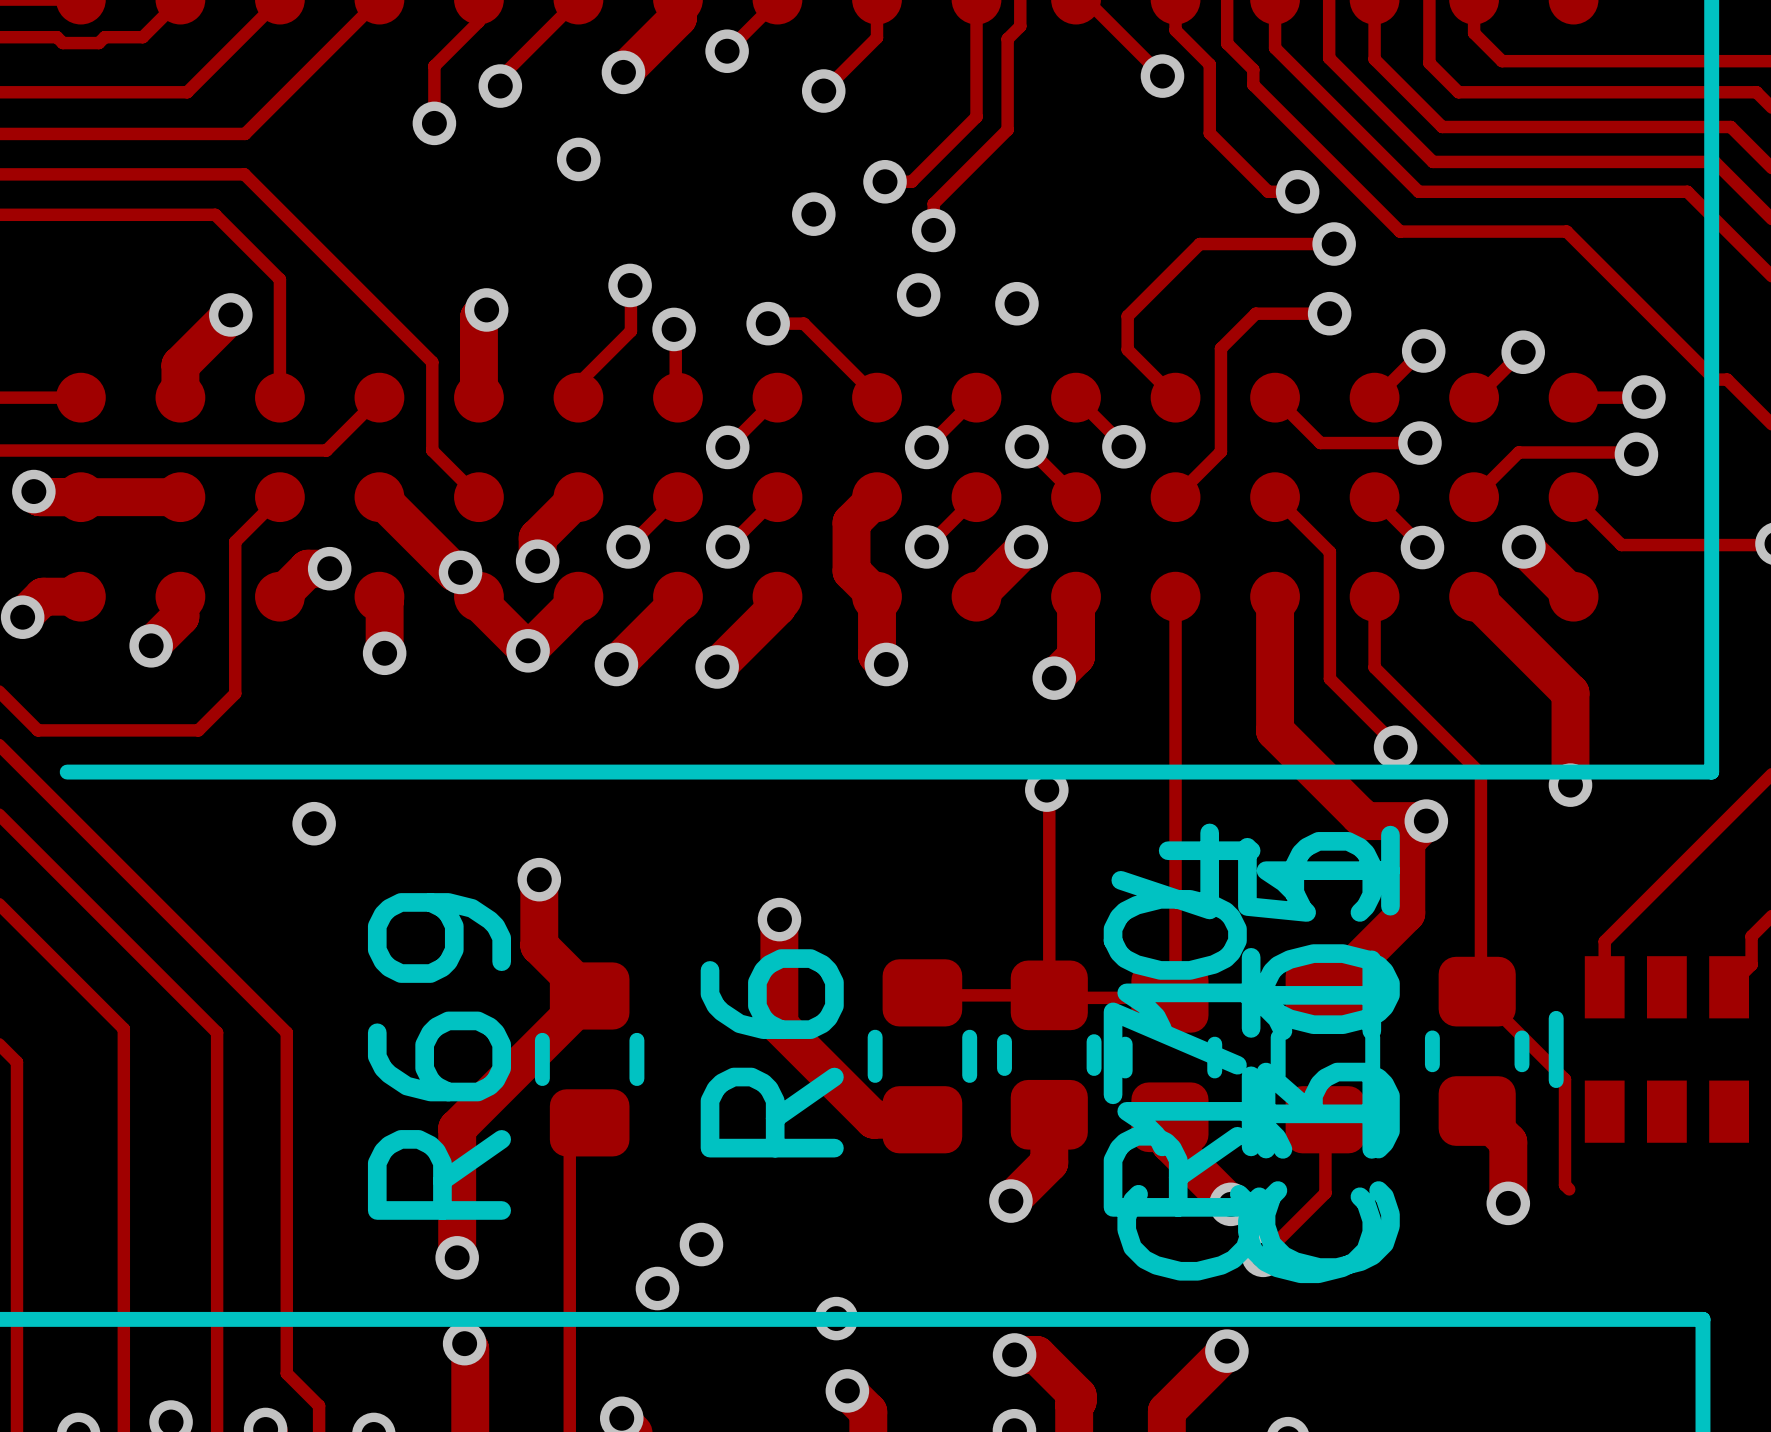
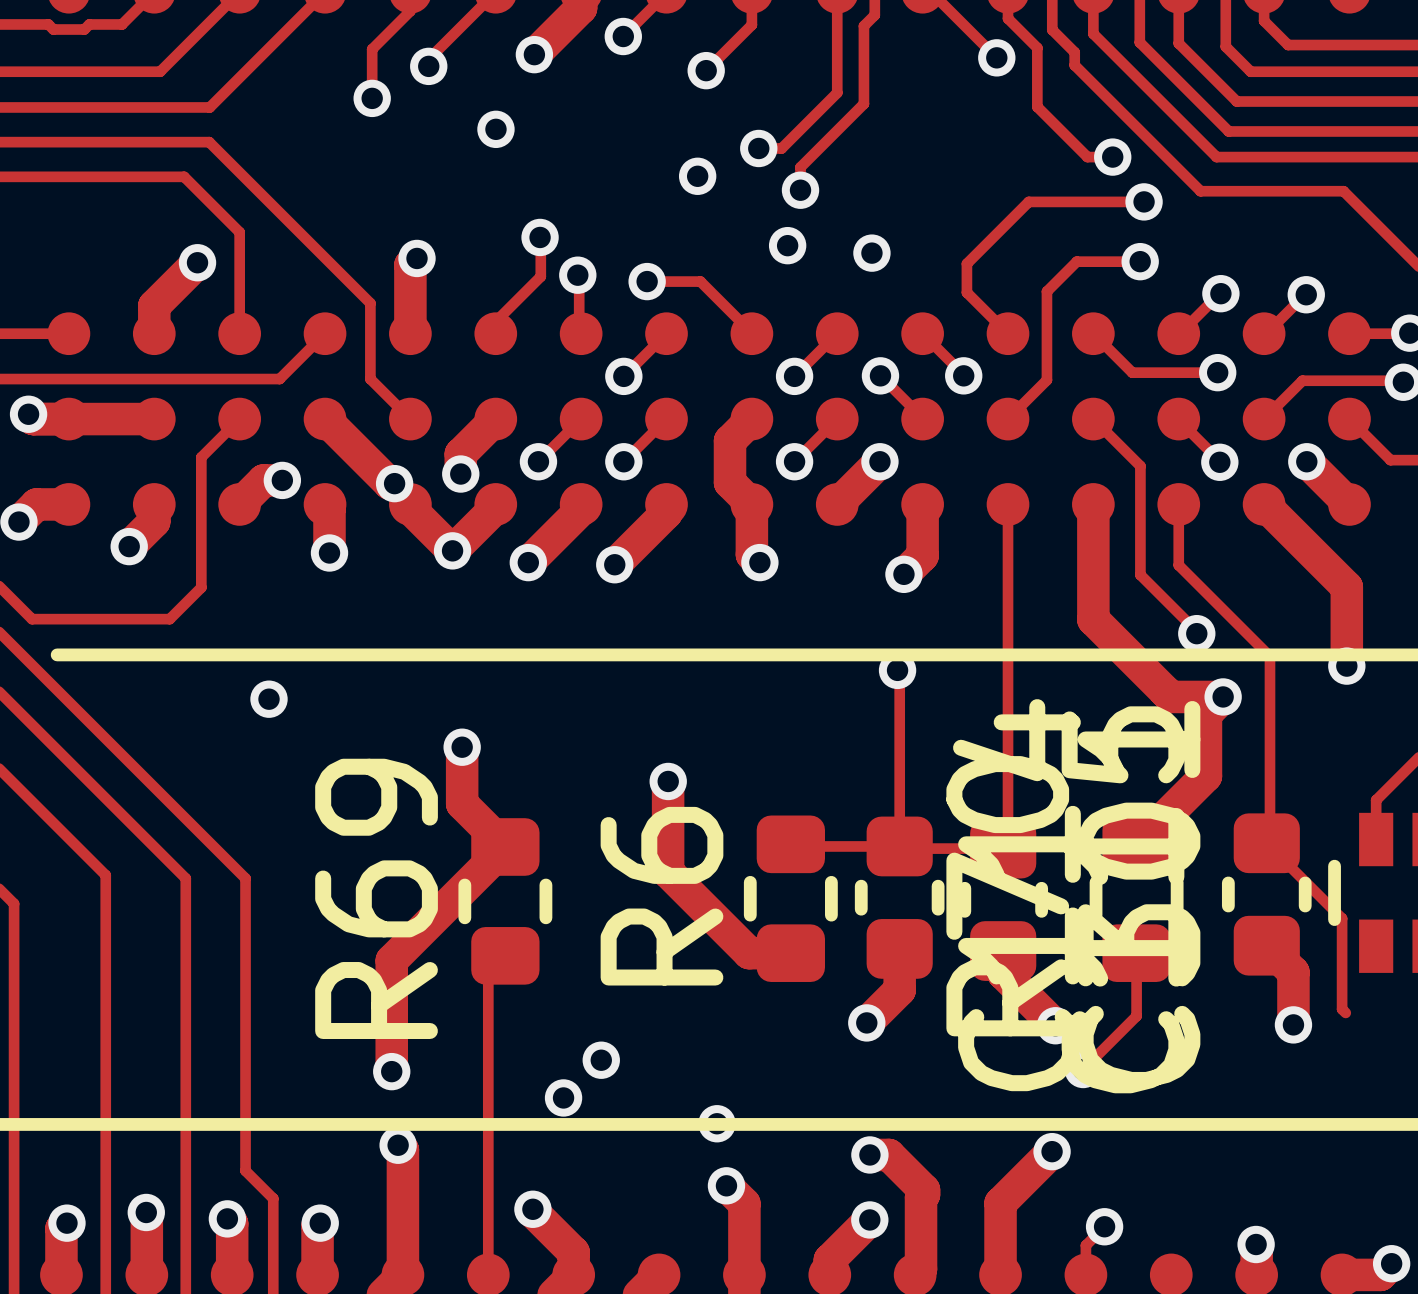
track: (768, 323) (803, 323) (817, 336) -> (647, 281) (700, 281)
via position: (768, 323) -> (647, 281)

